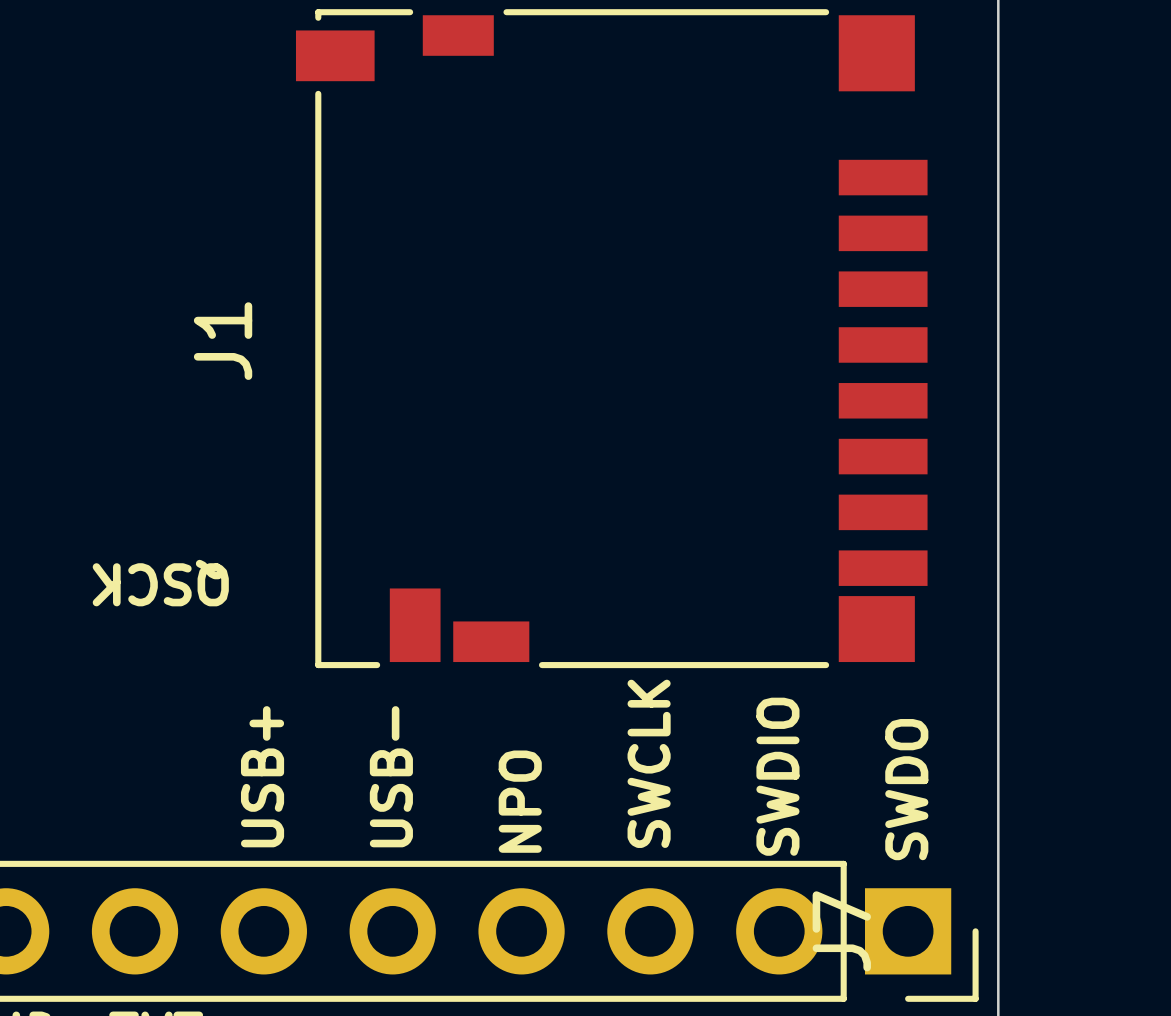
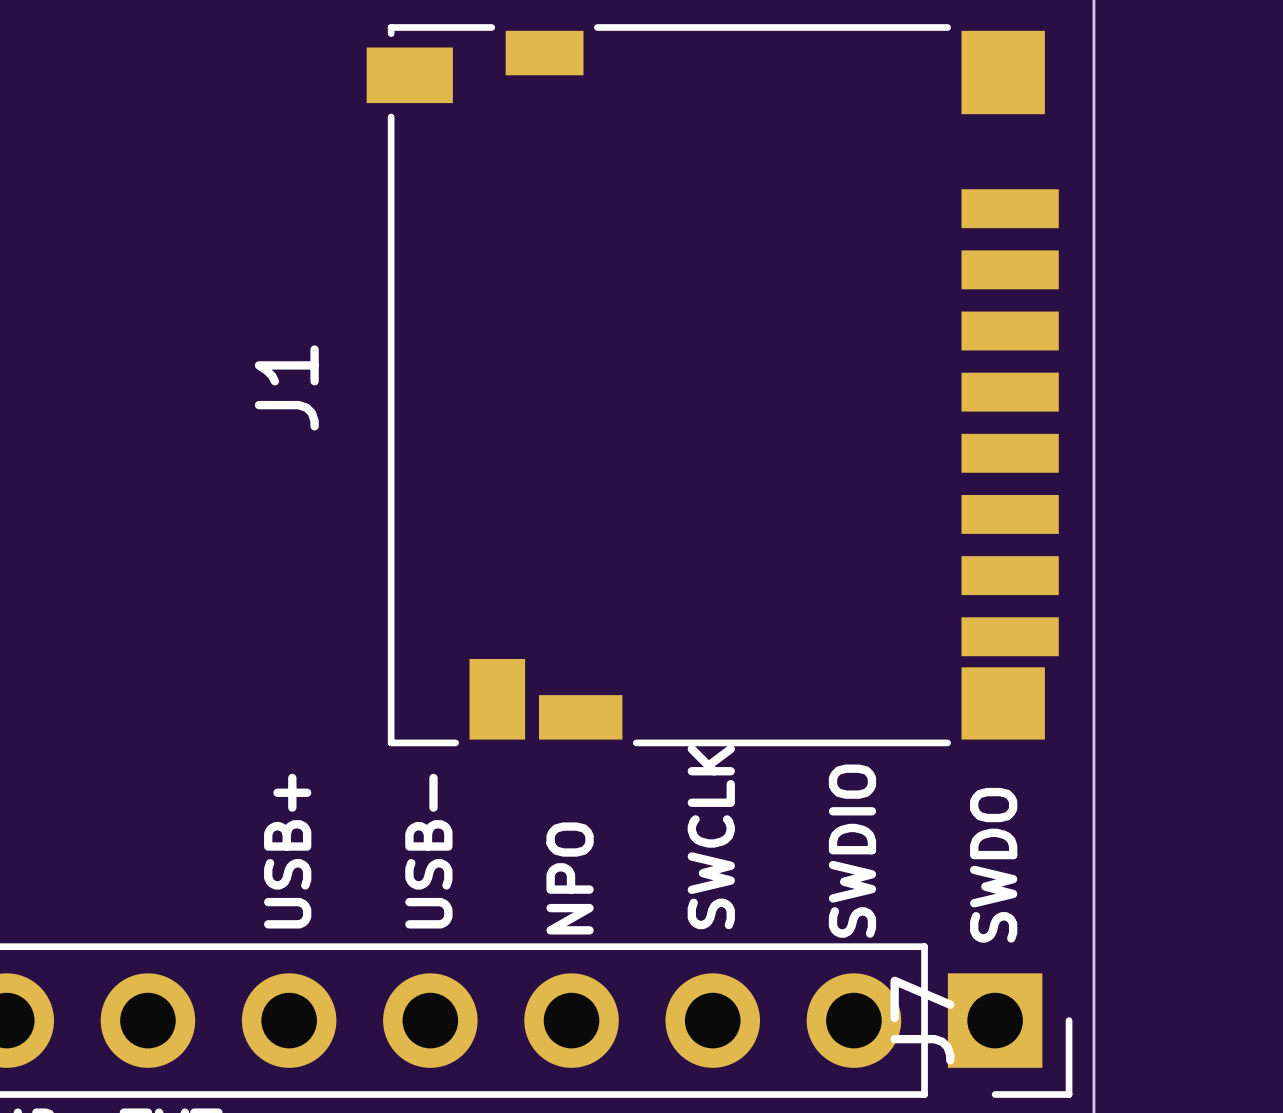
J1 position: (611, 338) -> (712, 385)
text: QSCK (160, 583) -> none

